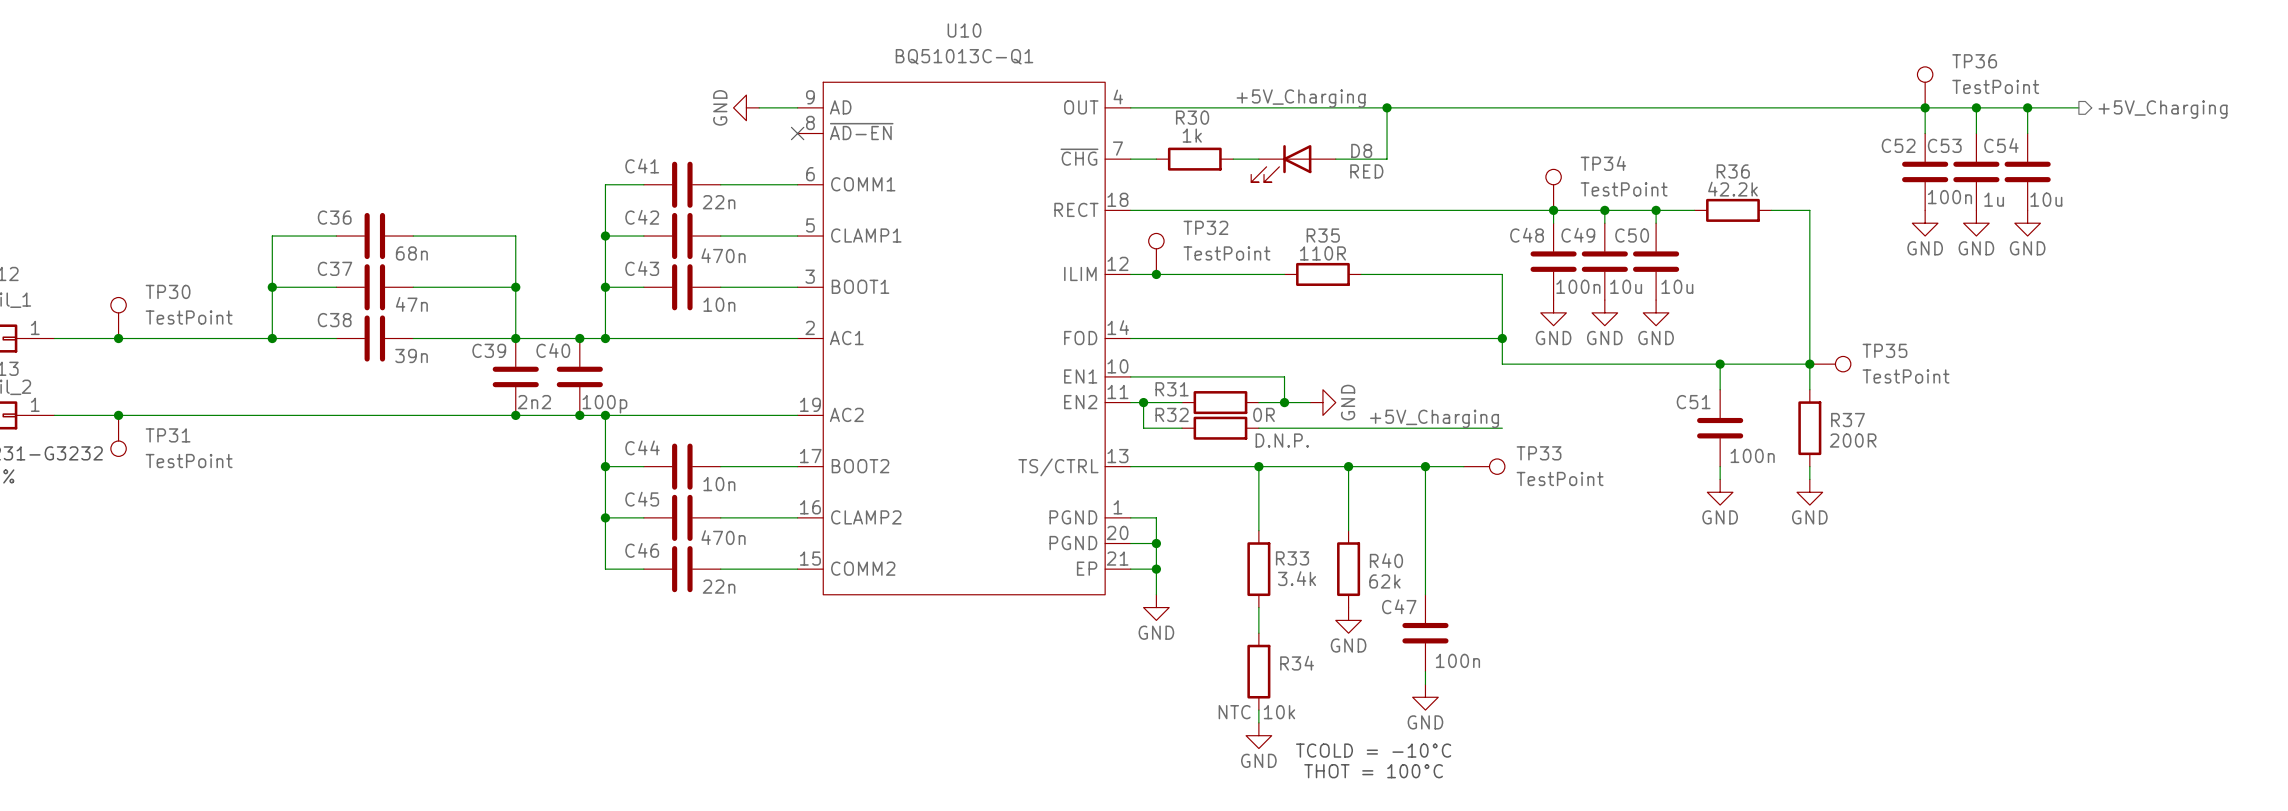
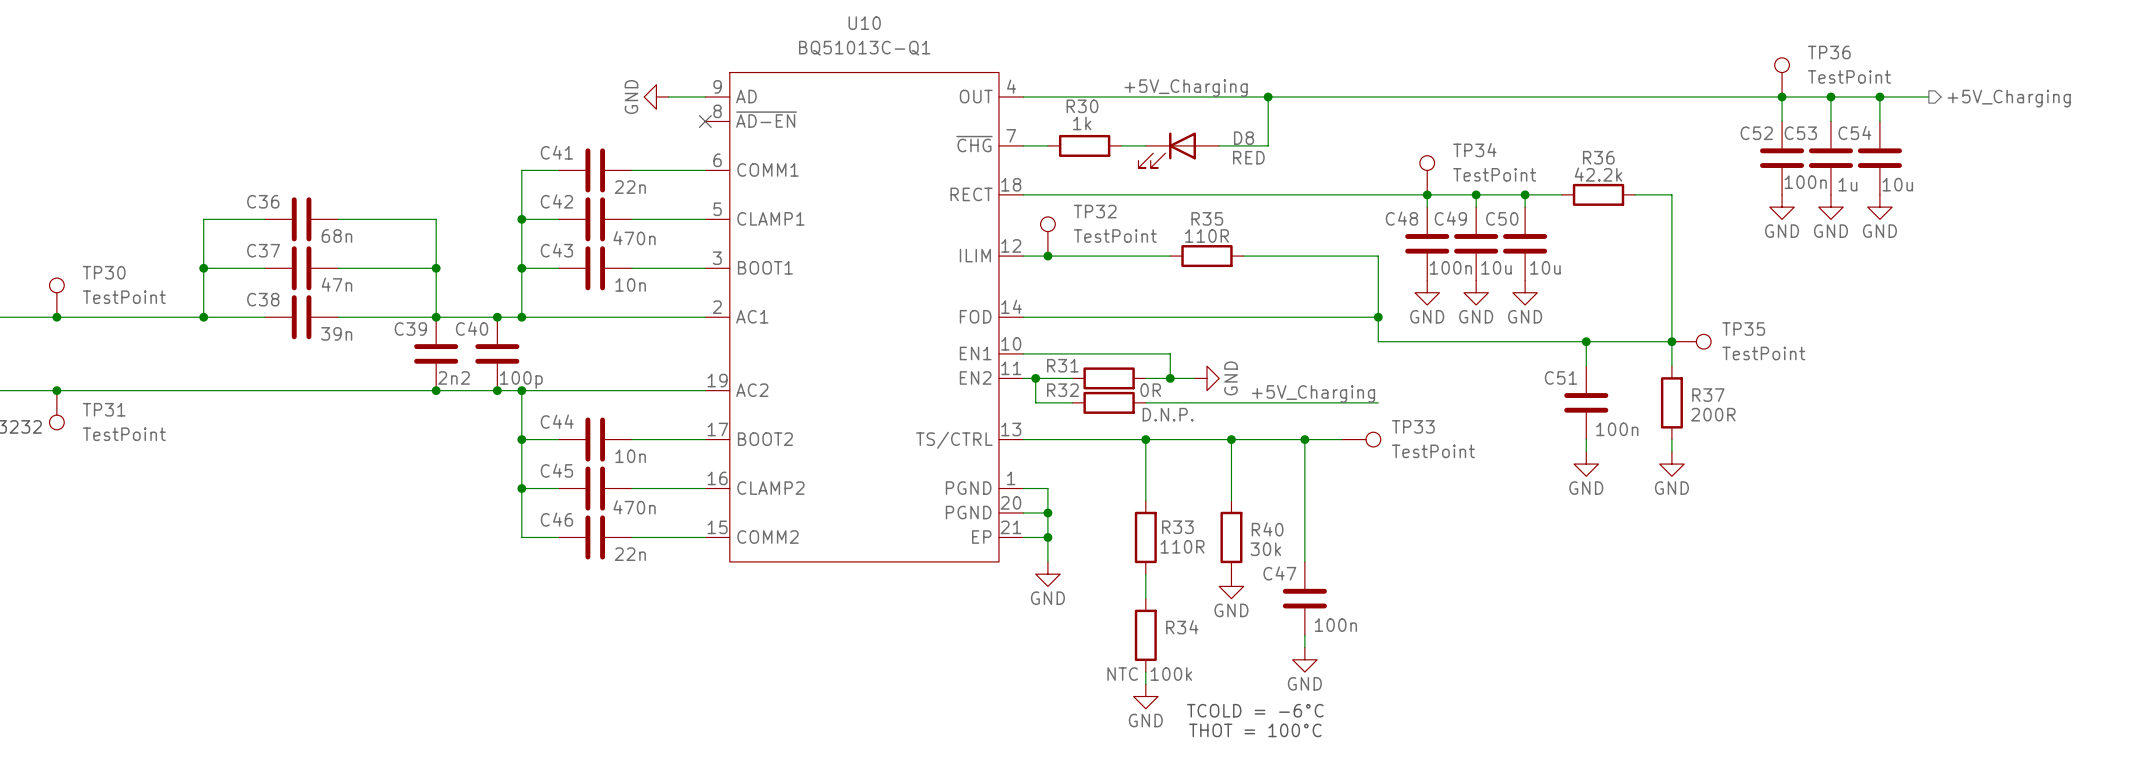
R33 value: 3.4k (1297, 578) -> 110R (1182, 546)
R40 value: 62k (1384, 581) -> 30k (1265, 549)
R34 value: NTC 10k (1256, 712) -> NTC 100k (1149, 674)
text: TCOLD = -10°C (1373, 750) -> TCOLD = -6°C (1255, 710)

